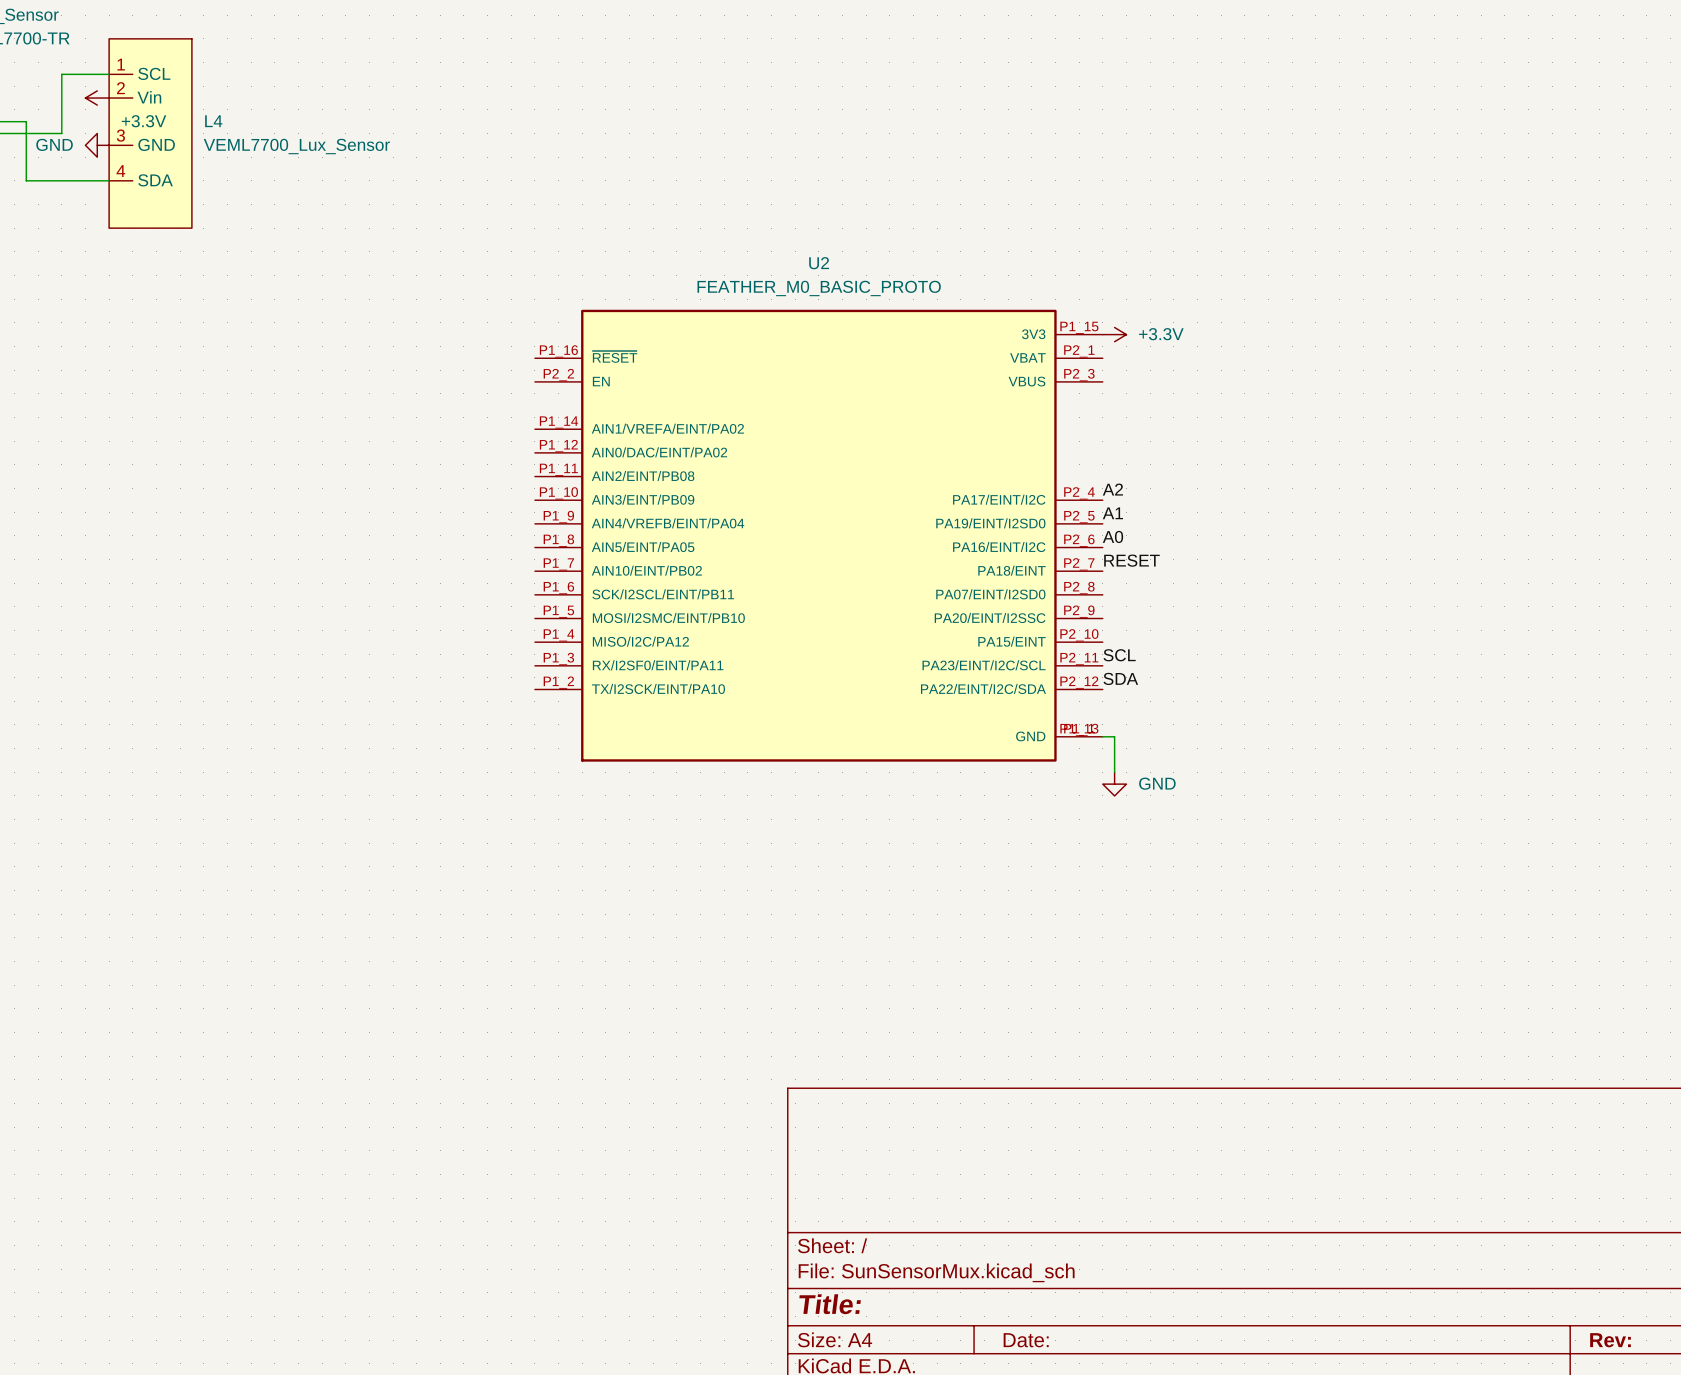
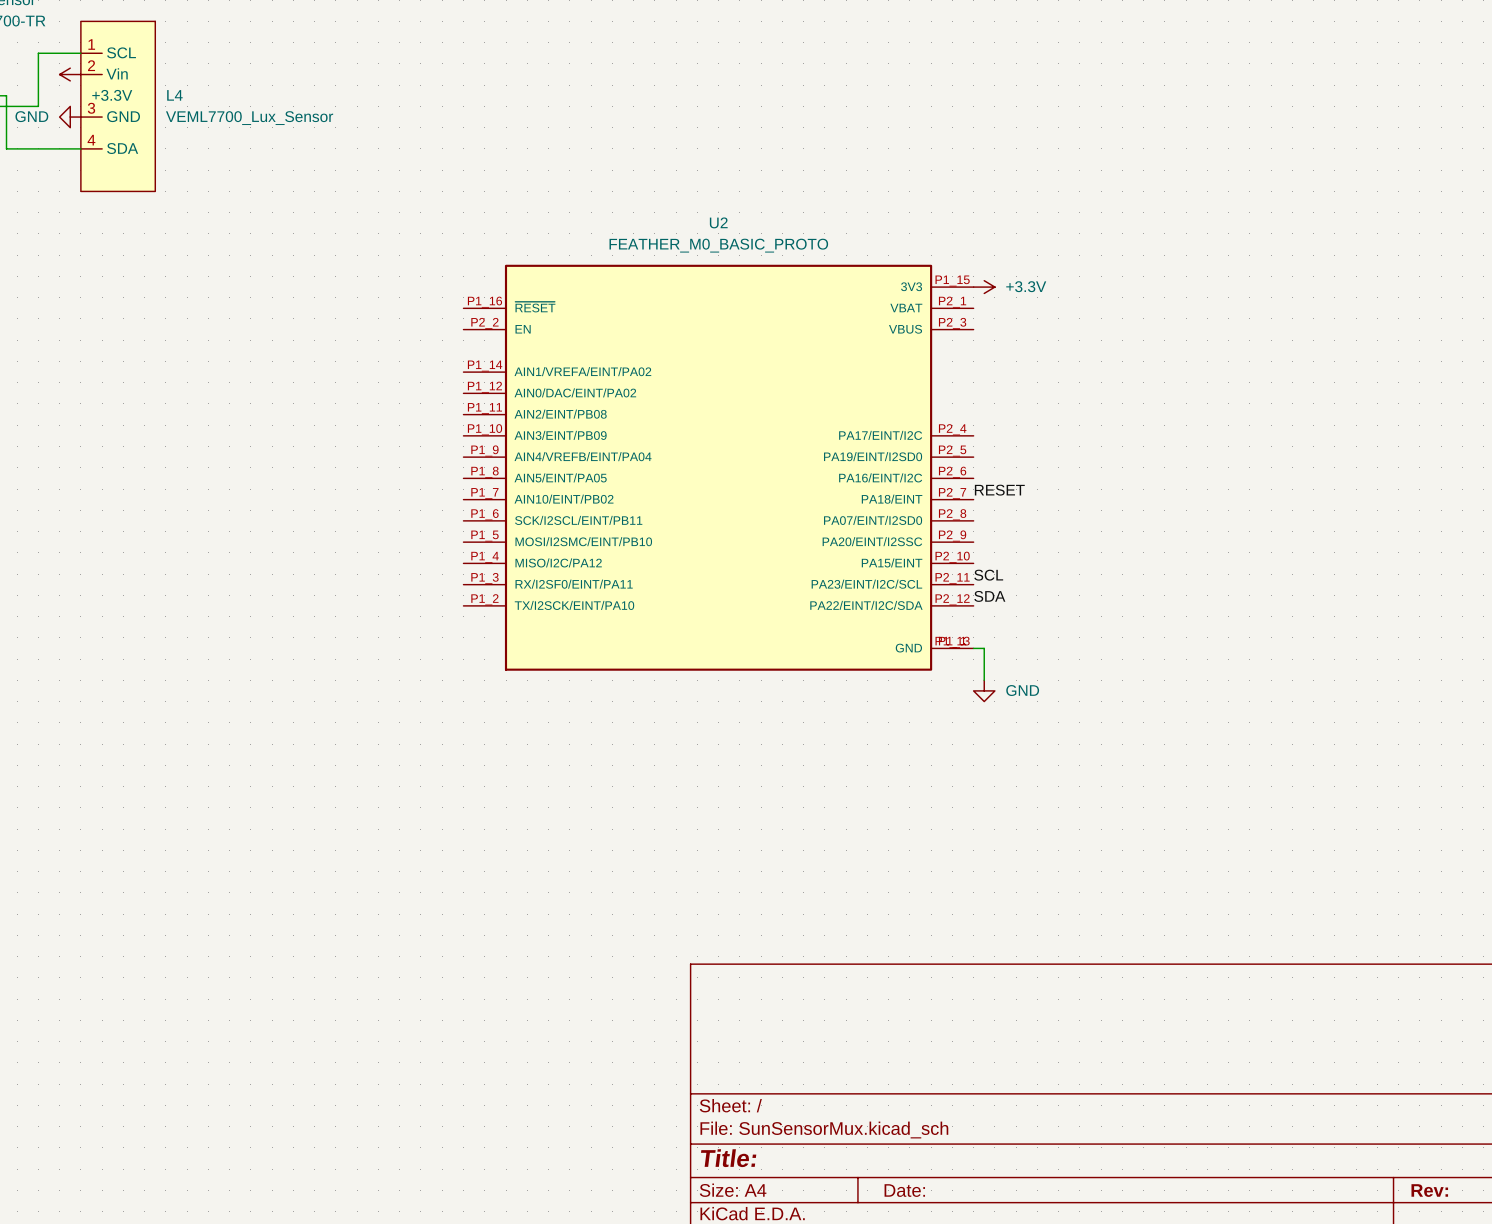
label: A2 (1112, 489) -> none
label: A1 (1112, 513) -> none
label: A0 (1112, 536) -> none

